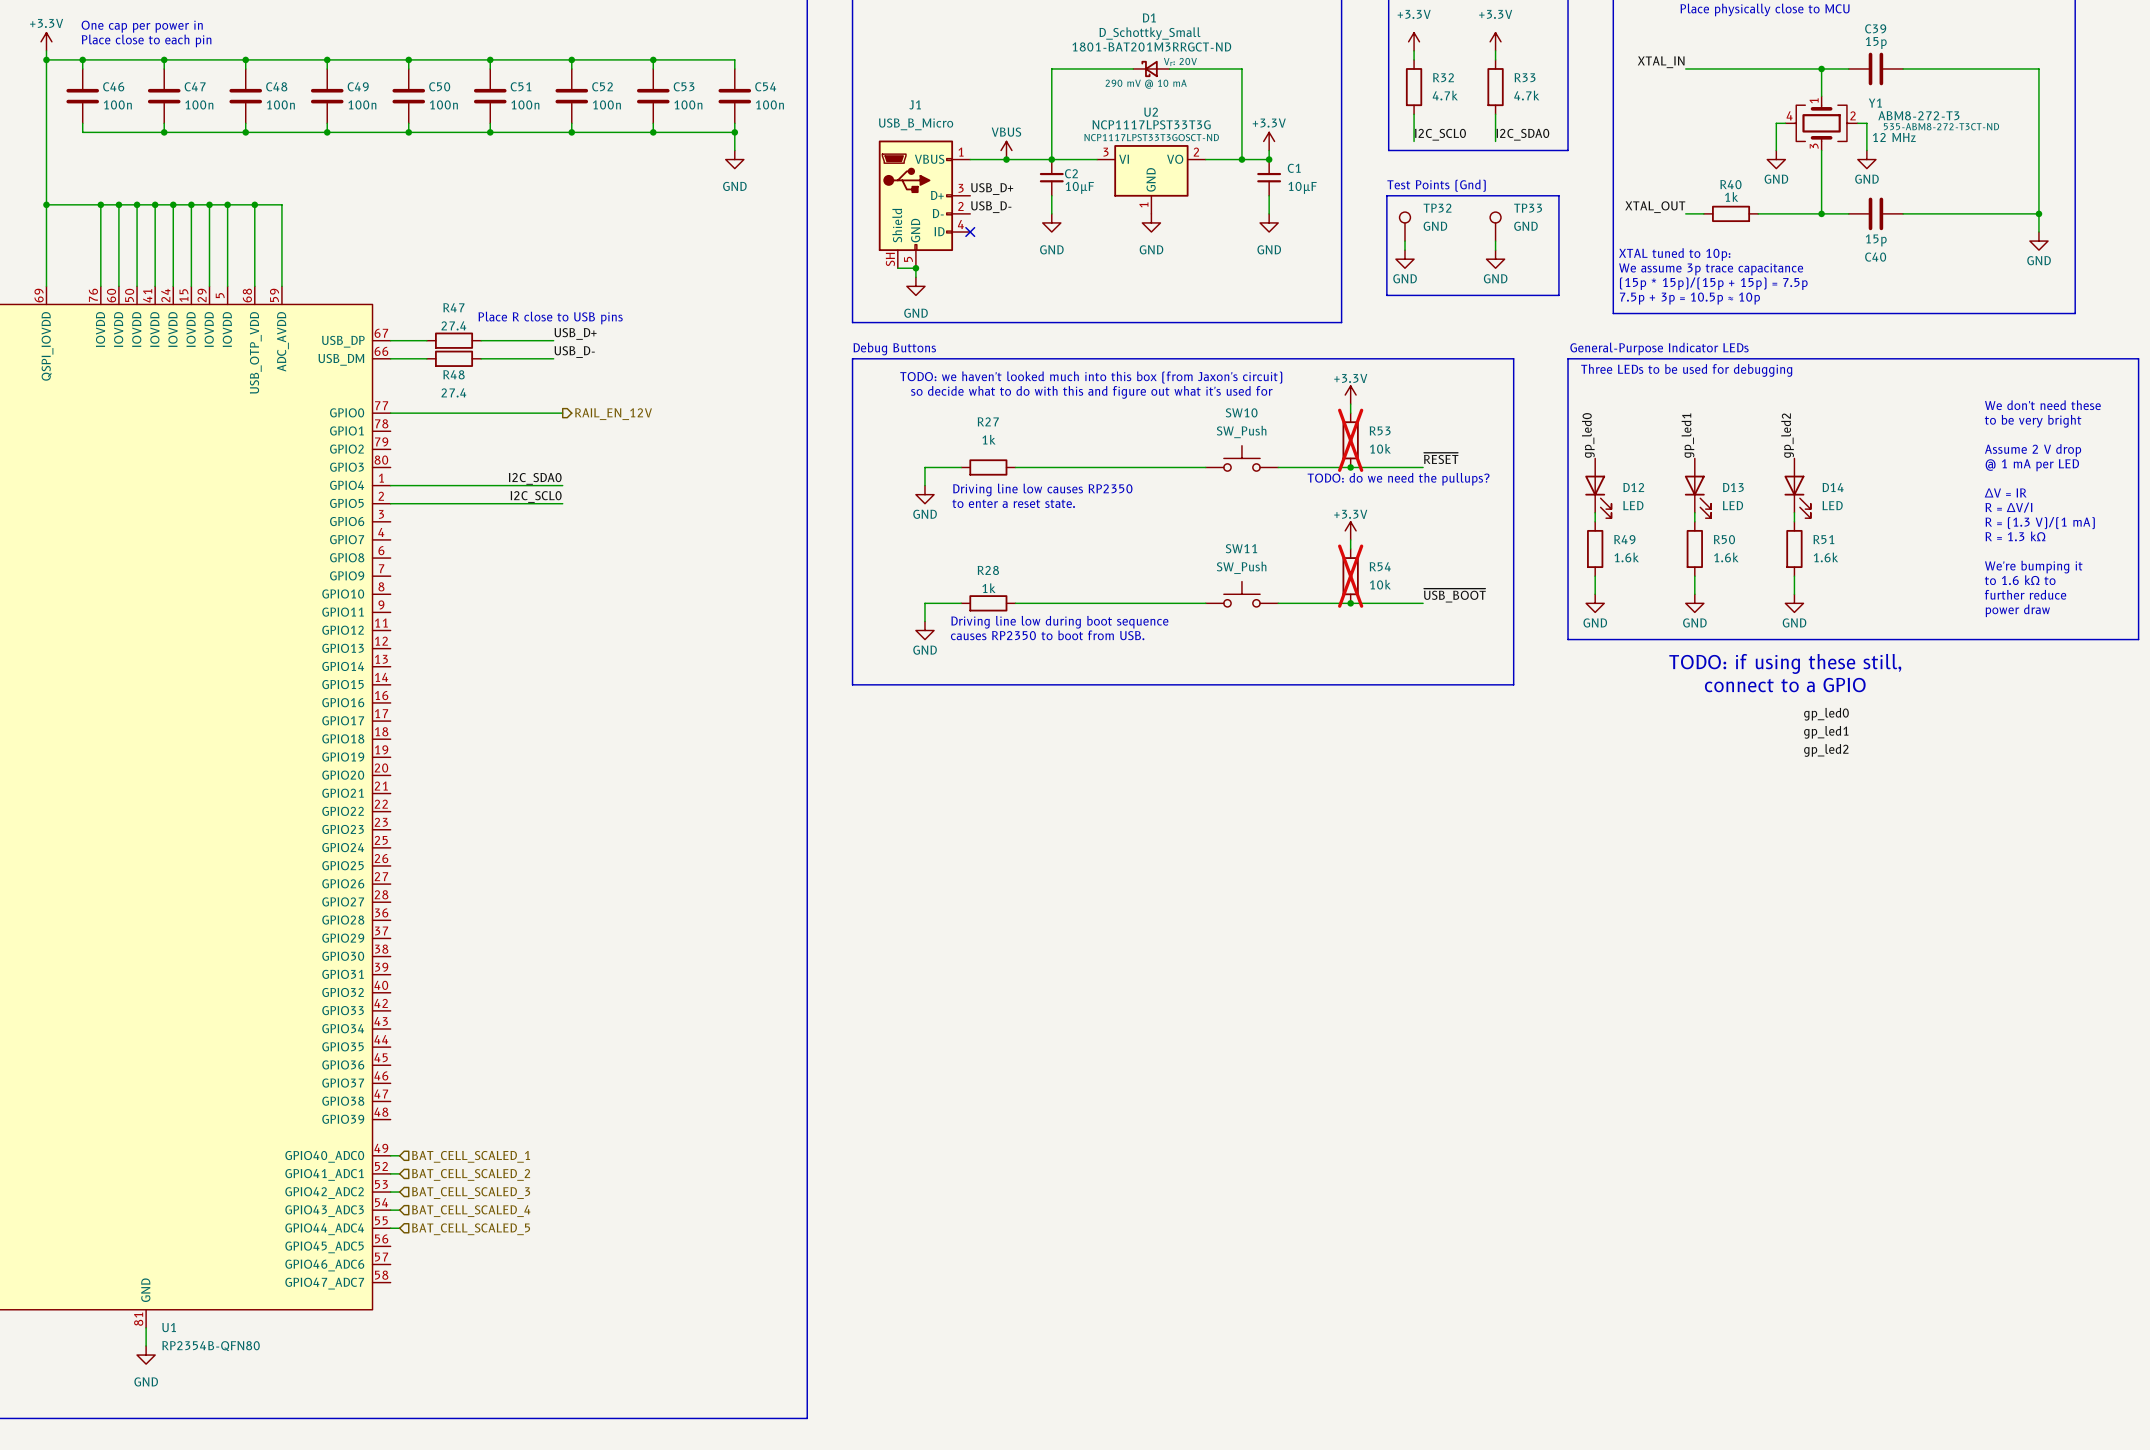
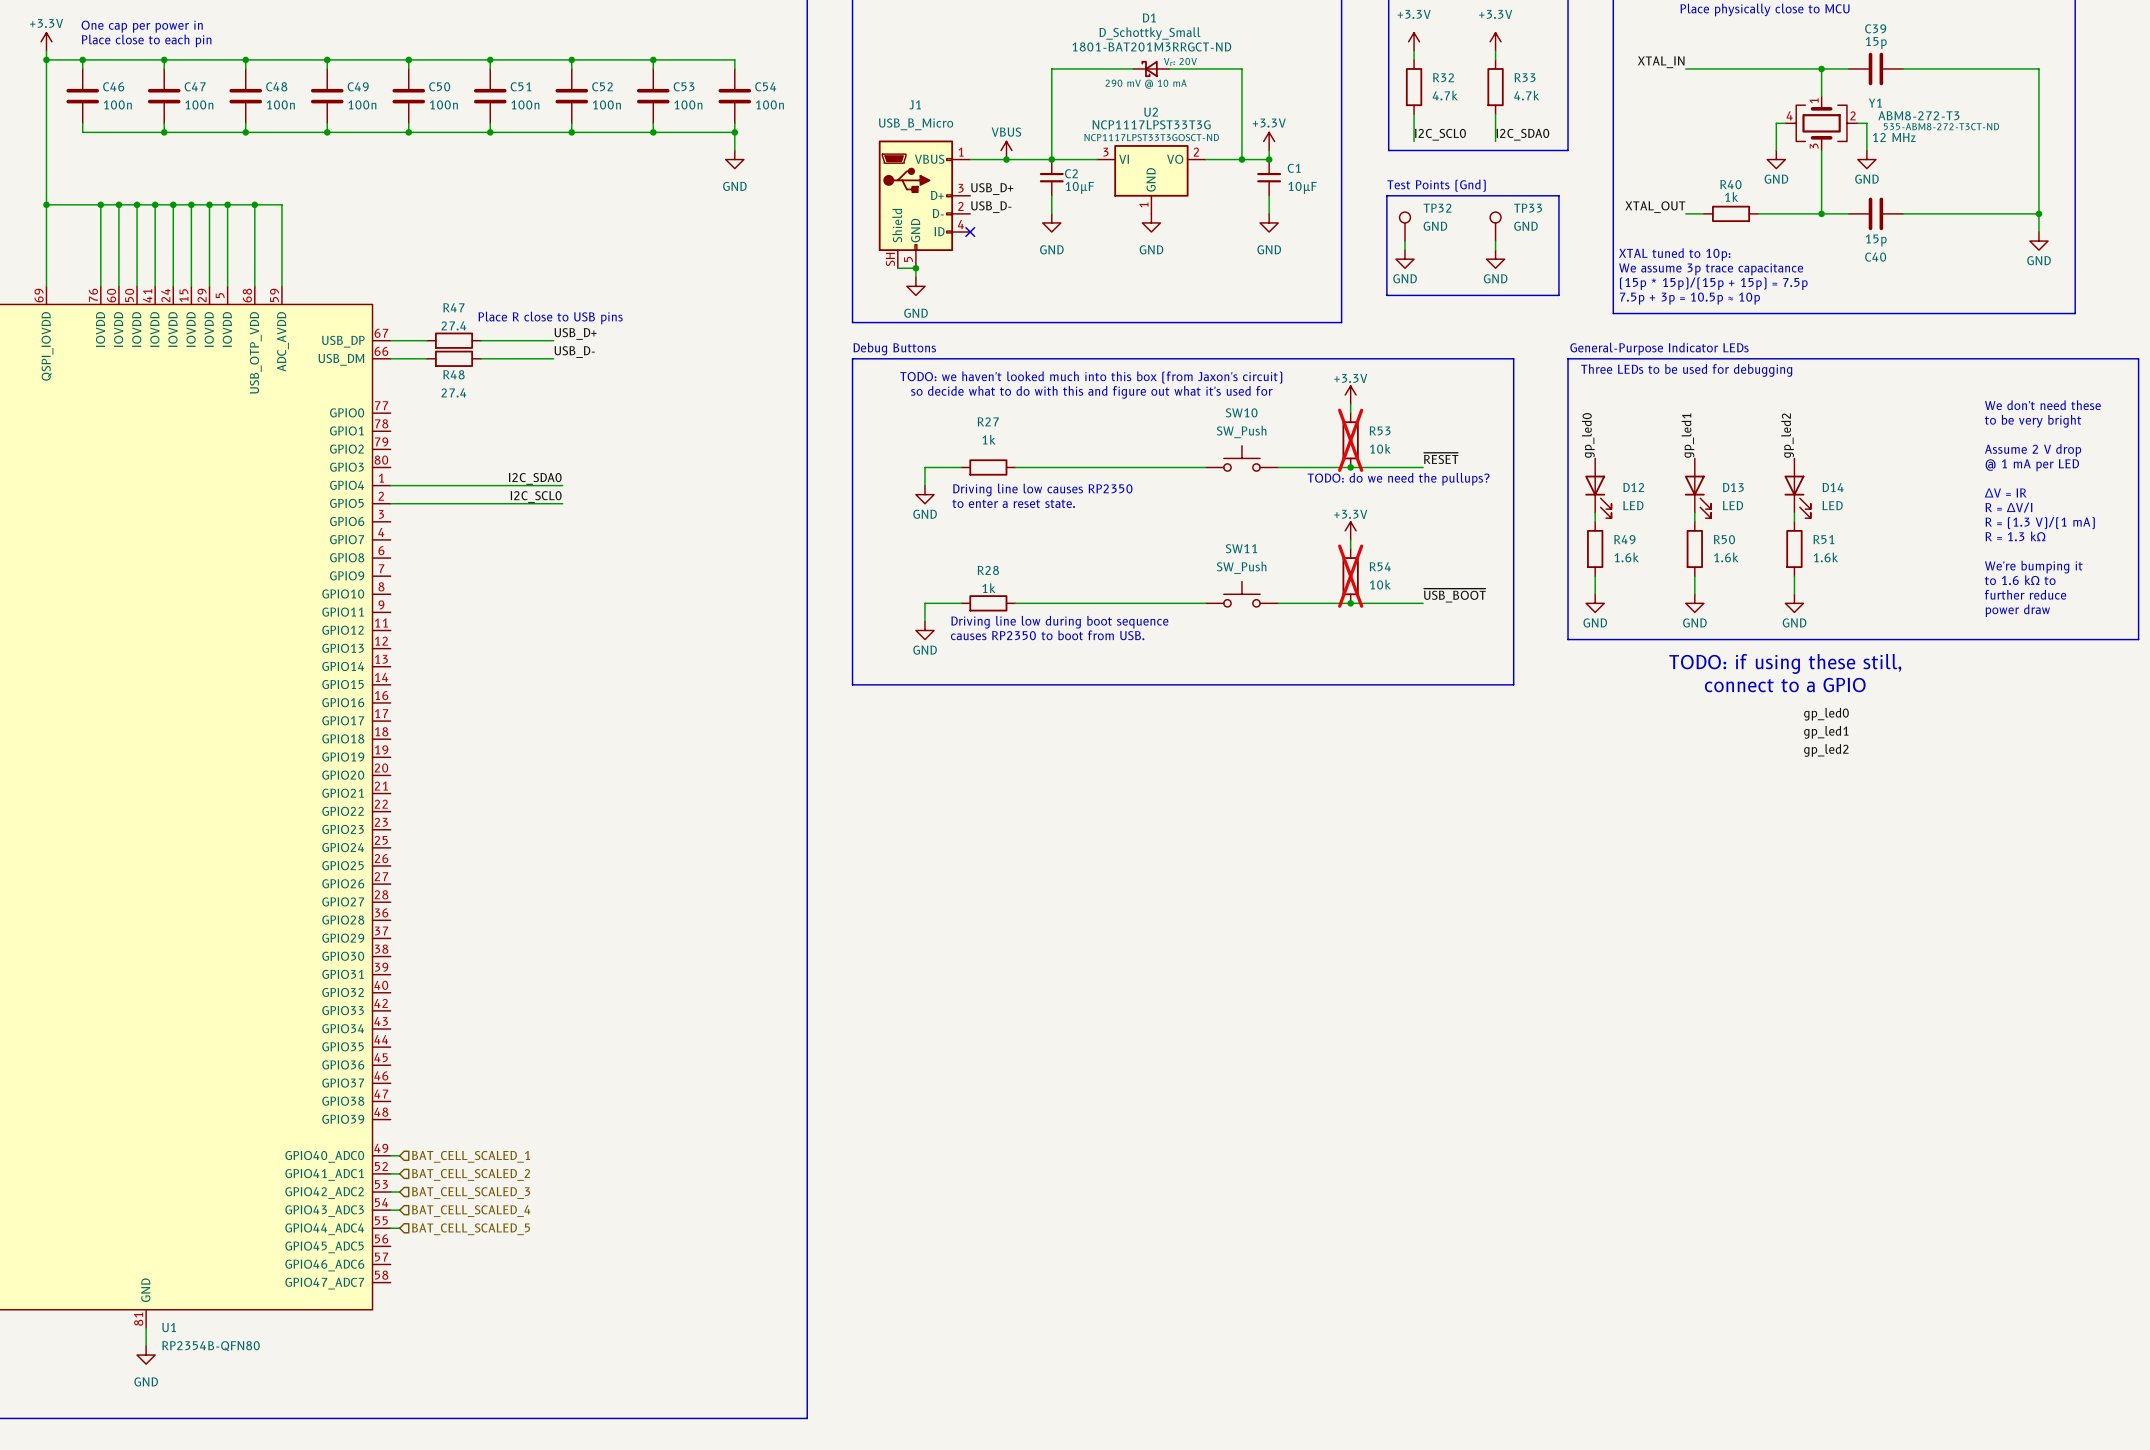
wire: (390, 413) (562, 413) -> none
hierarchical label: RAIL_EN_12V (613, 414) -> none

